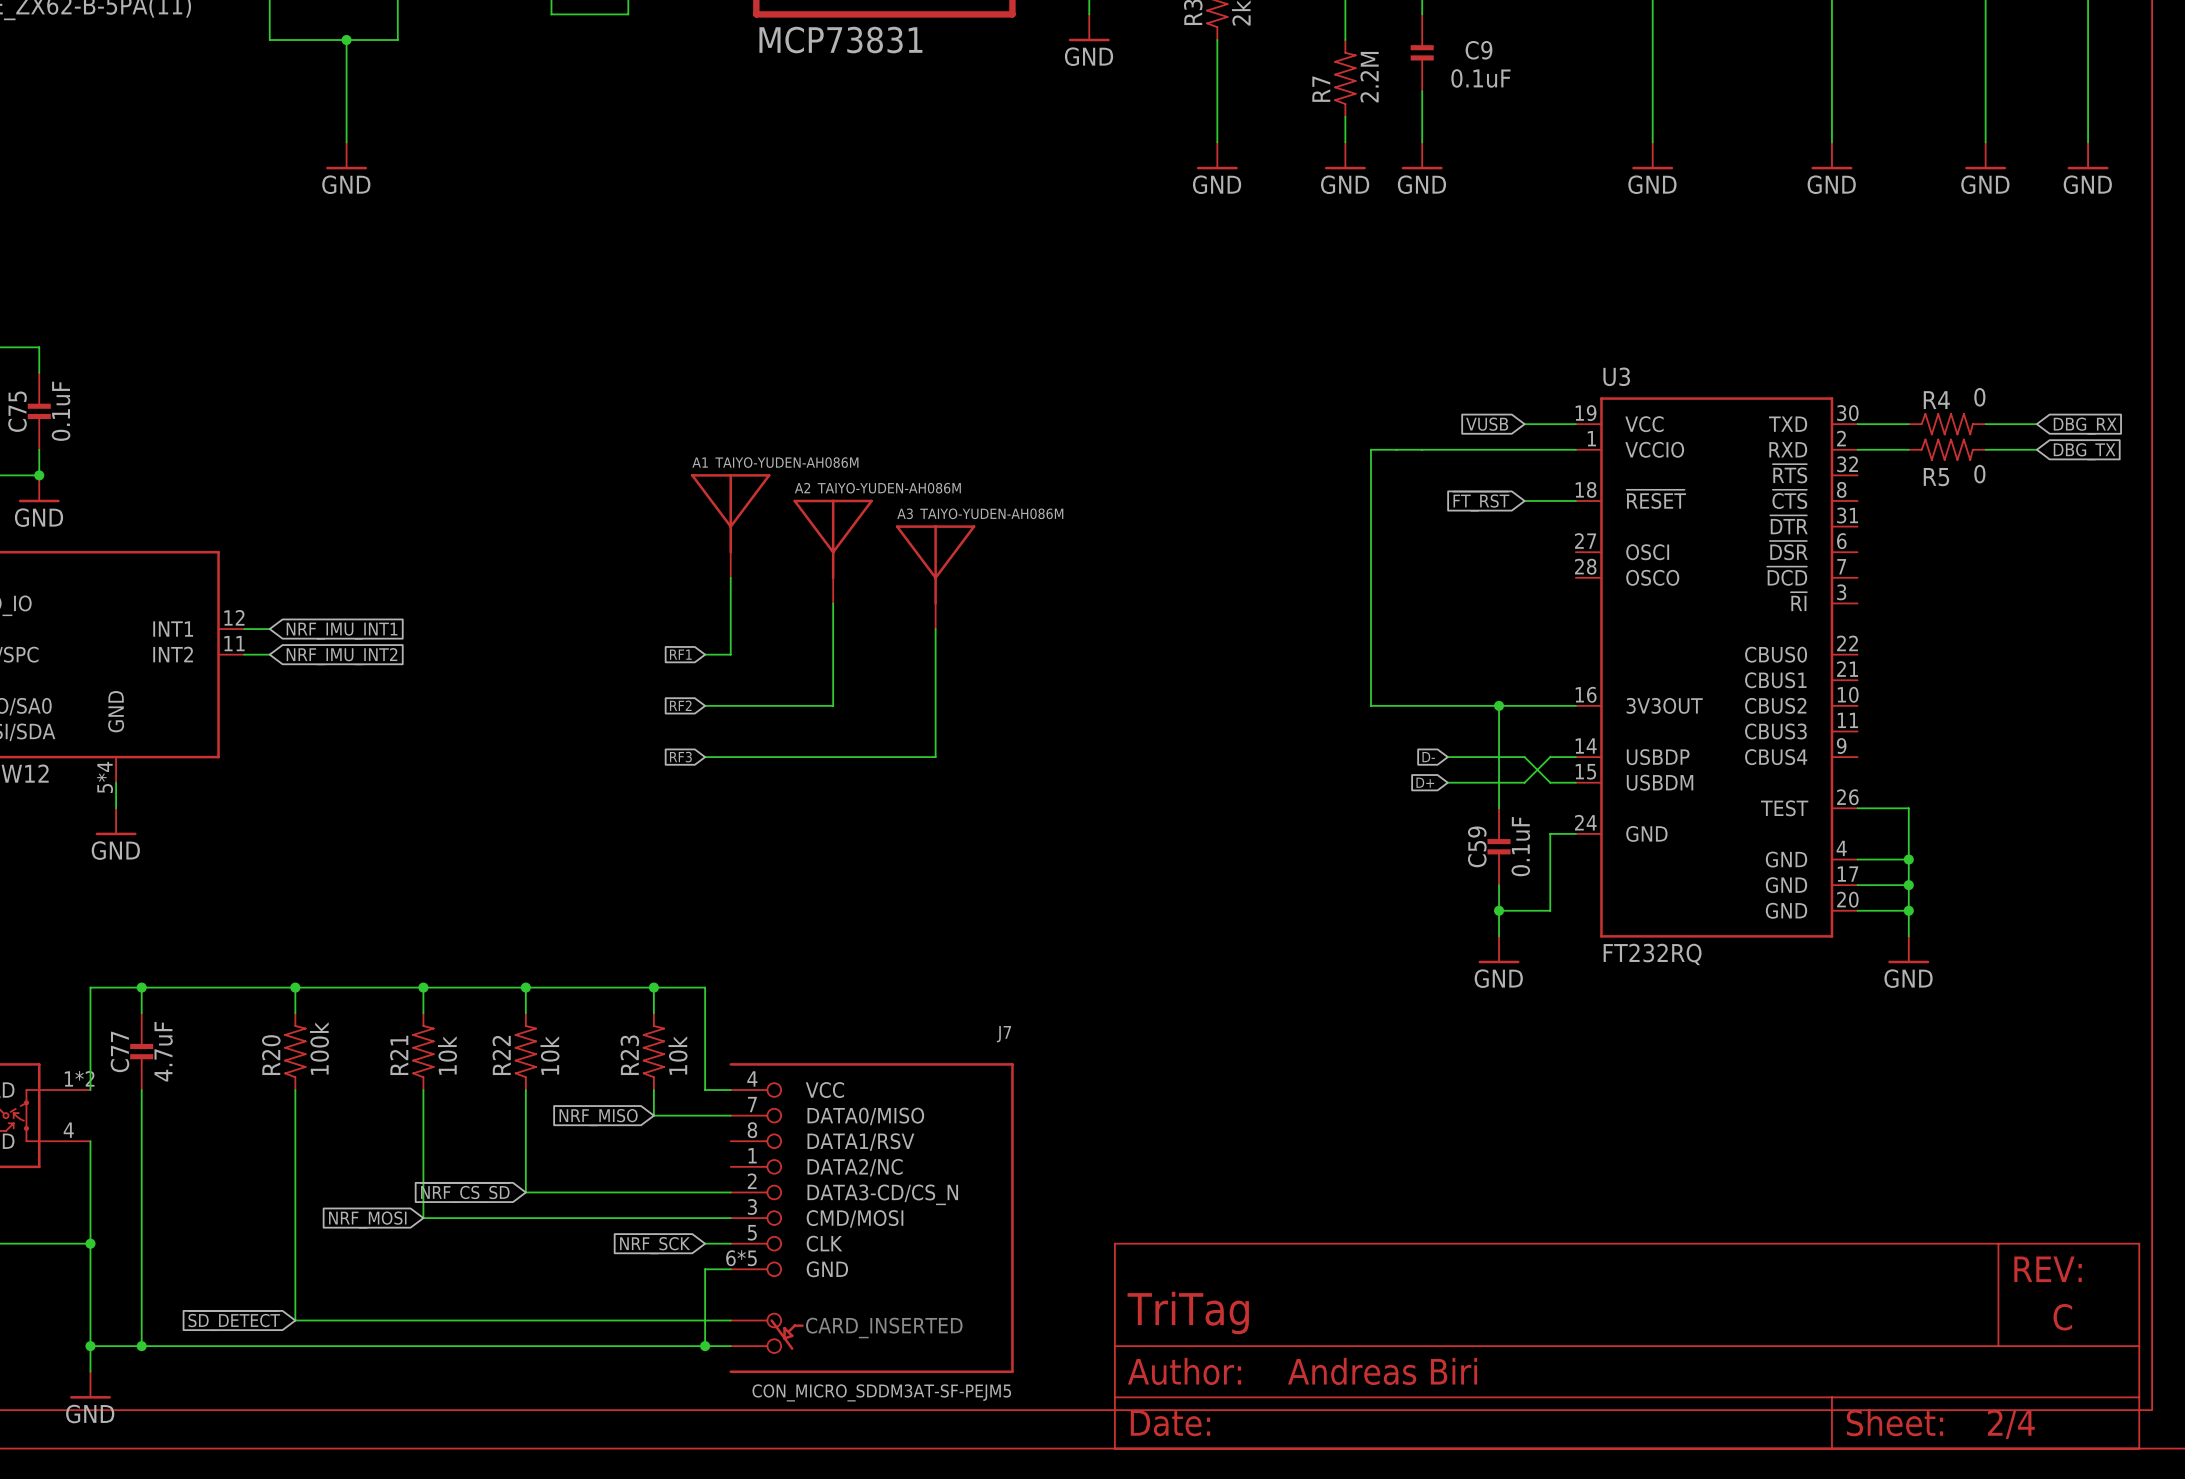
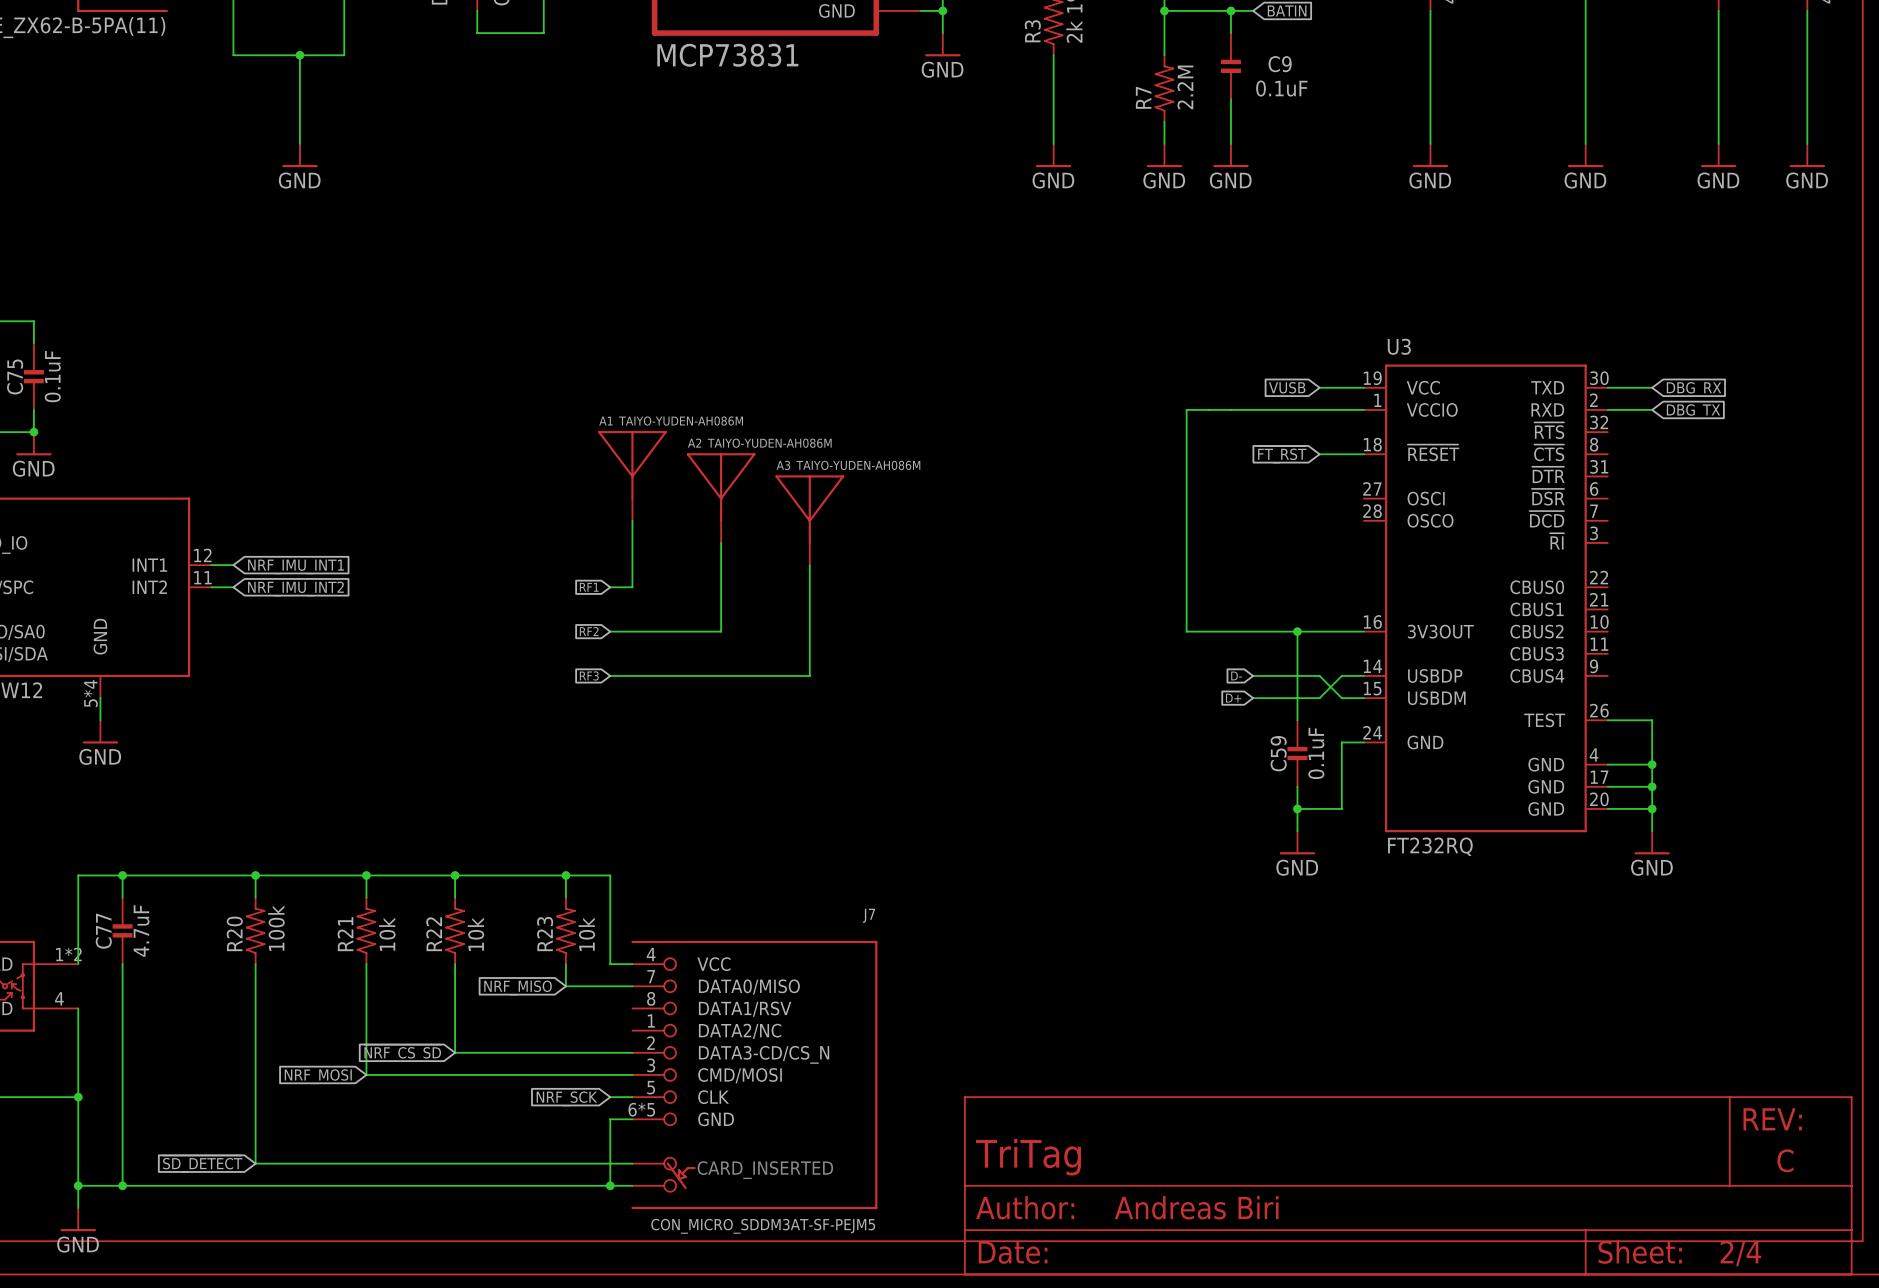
R4: 0 (1947, 424) -> none
wire: (1985, 424) (2036, 424) -> none
global label position: DBG_RX (2085, 426) -> DBG_RX (1694, 389)
R5: 0 (1947, 449) -> none
wire: (1985, 449) (2036, 449) -> none
global label position: DBG_TX (2084, 451) -> DBG_TX (1693, 411)

